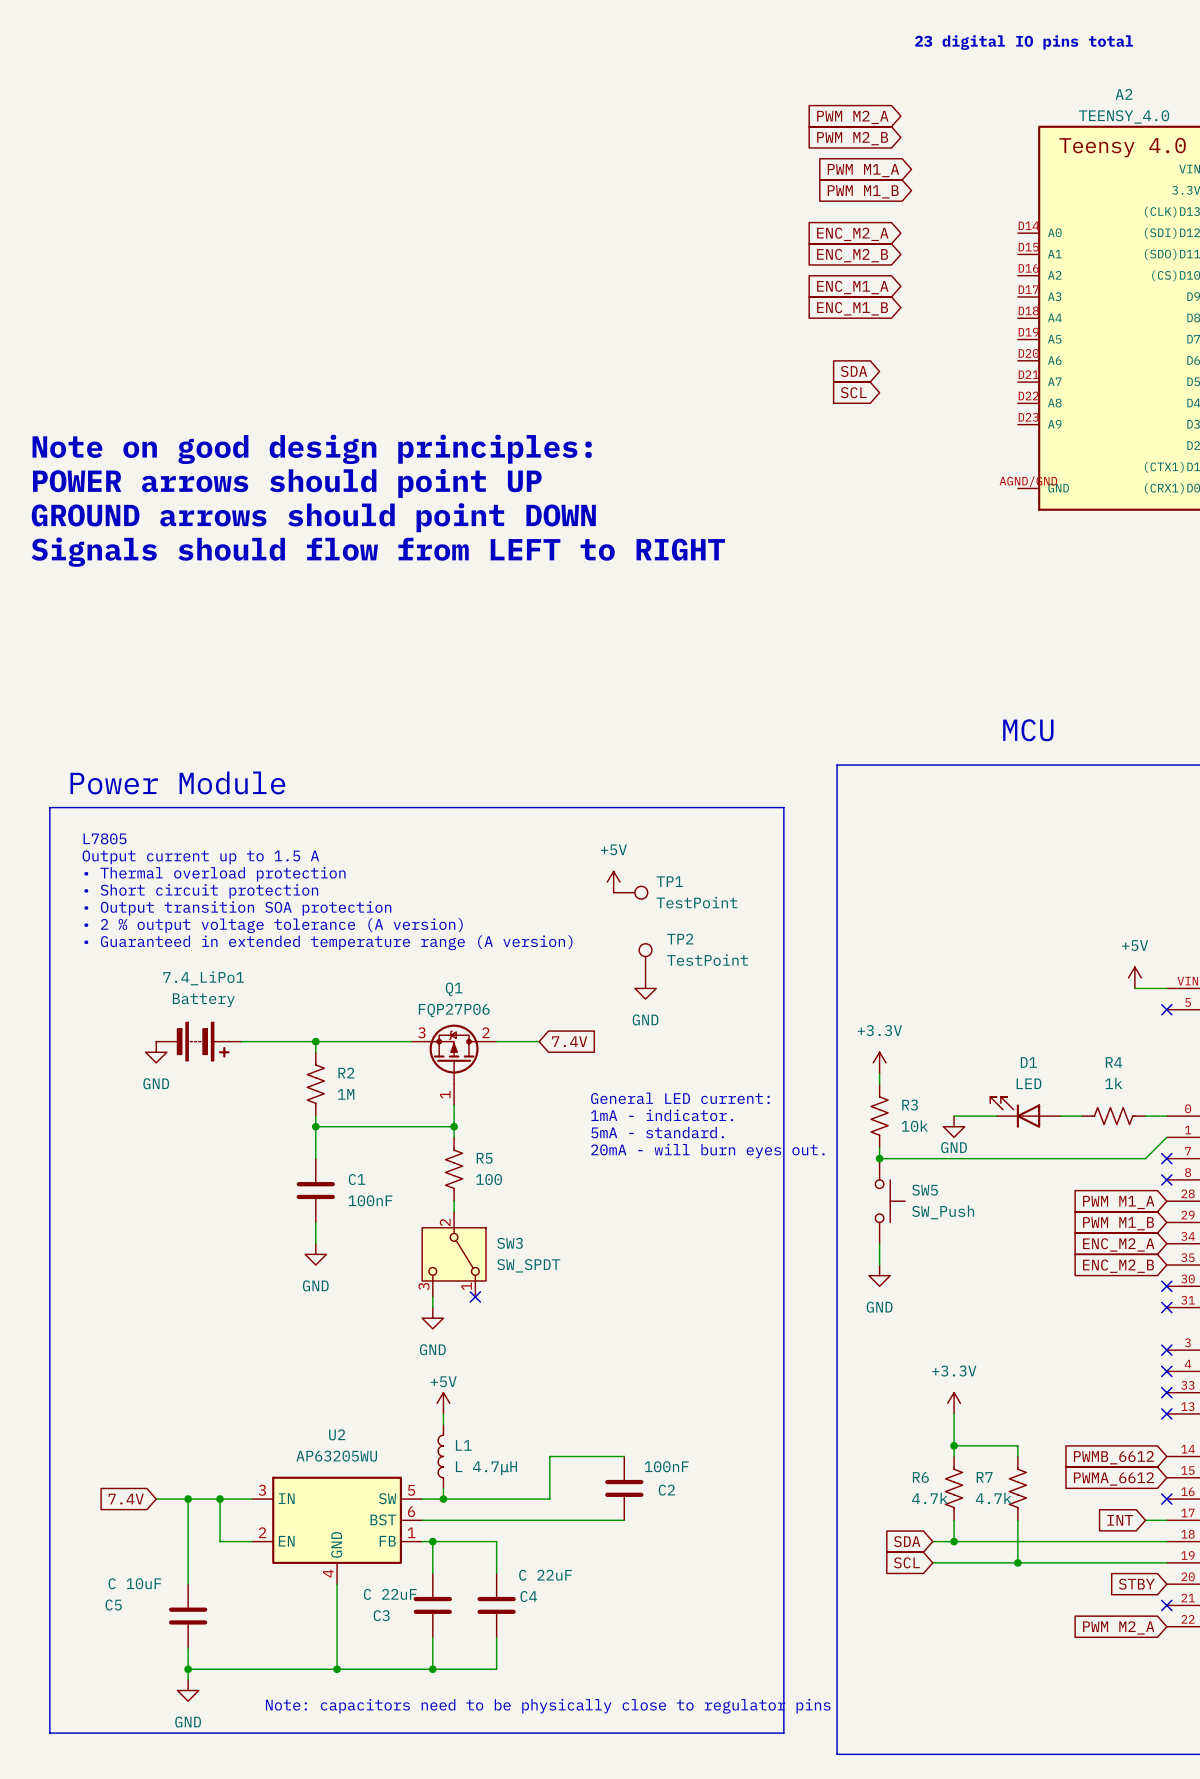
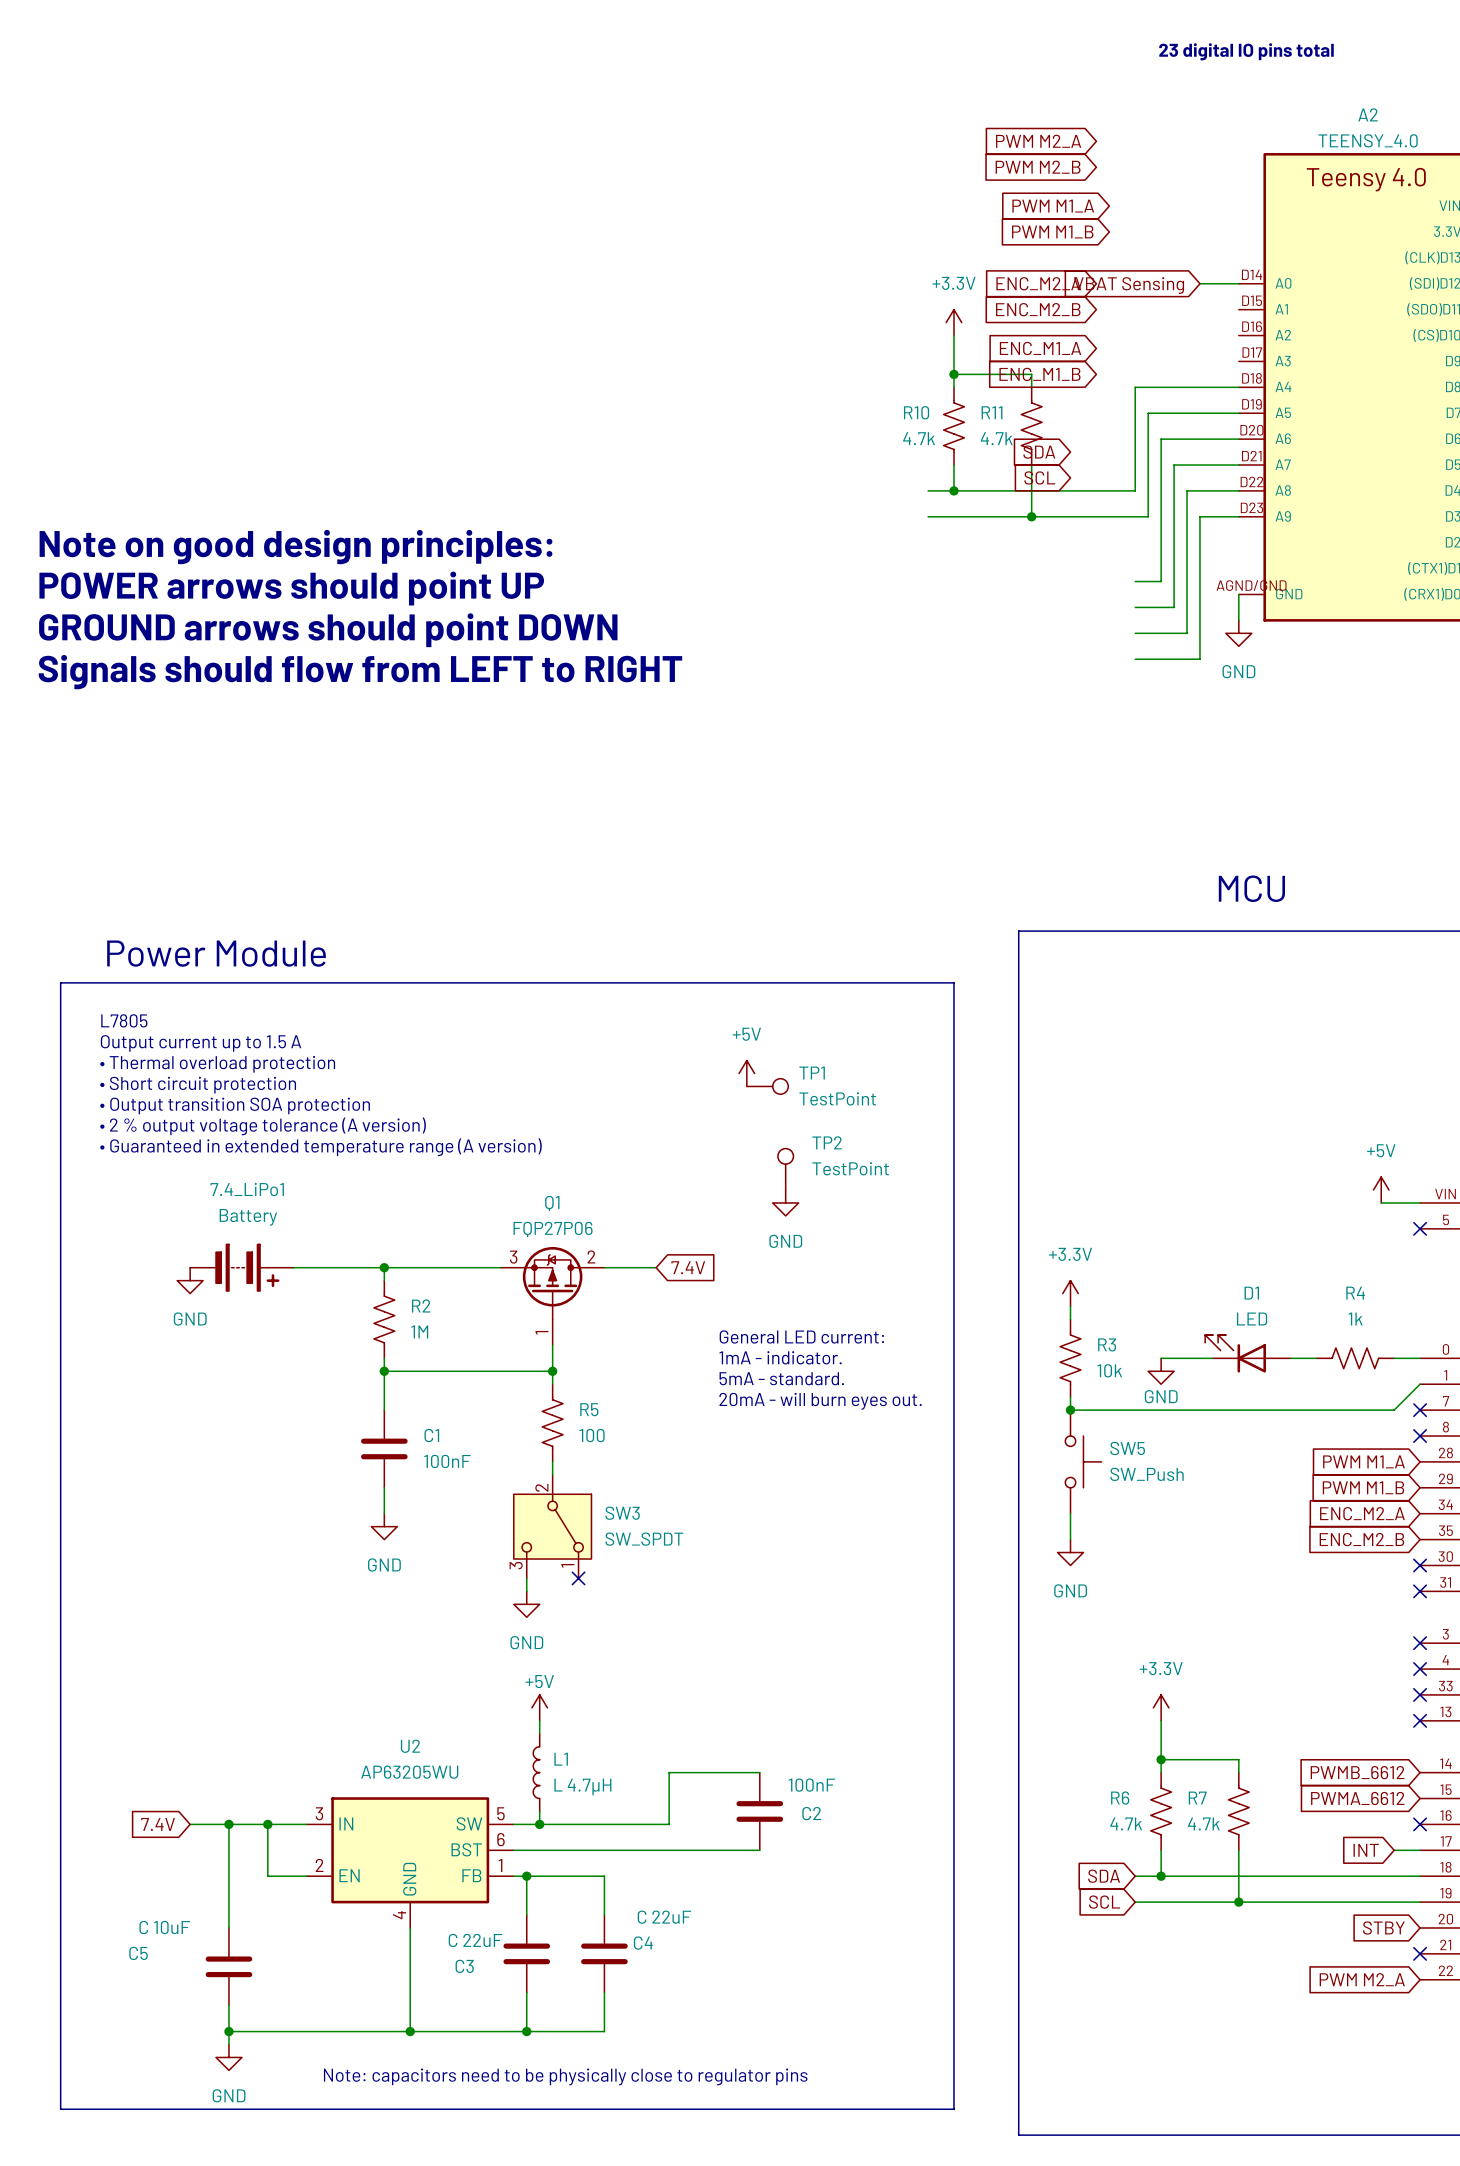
wire: none -> (1199, 283) (1238, 283)
global label: none -> VBAT Sensing (1129, 285)
power symbol: none -> +3.3V (953, 322)
wire: none -> (953, 335) (953, 387)
wire: none -> (953, 374) (1031, 374) (1031, 387)
junction: none -> (953, 374)
wire: none -> (1238, 387) (1135, 387) (1135, 490) (928, 490)
wire: none -> (1238, 413) (1148, 413) (1148, 516) (928, 516)
R10: none -> 4.7k (953, 426)
R11: none -> 4.7k (1031, 426)
wire: none -> (1238, 439) (1161, 439) (1161, 581) (1135, 581)
wire: none -> (953, 465) (953, 490)
wire: none -> (1031, 465) (1031, 516)
wire: none -> (1238, 465) (1174, 465) (1174, 607) (1135, 607)
junction: none -> (953, 490)
wire: none -> (1238, 490) (1187, 490) (1187, 633) (1135, 633)
junction: none -> (1031, 516)
wire: none -> (1238, 516) (1199, 516) (1199, 659) (1135, 659)
wire: none -> (1238, 594) (1238, 620)
power symbol: none -> GND (1238, 633)

